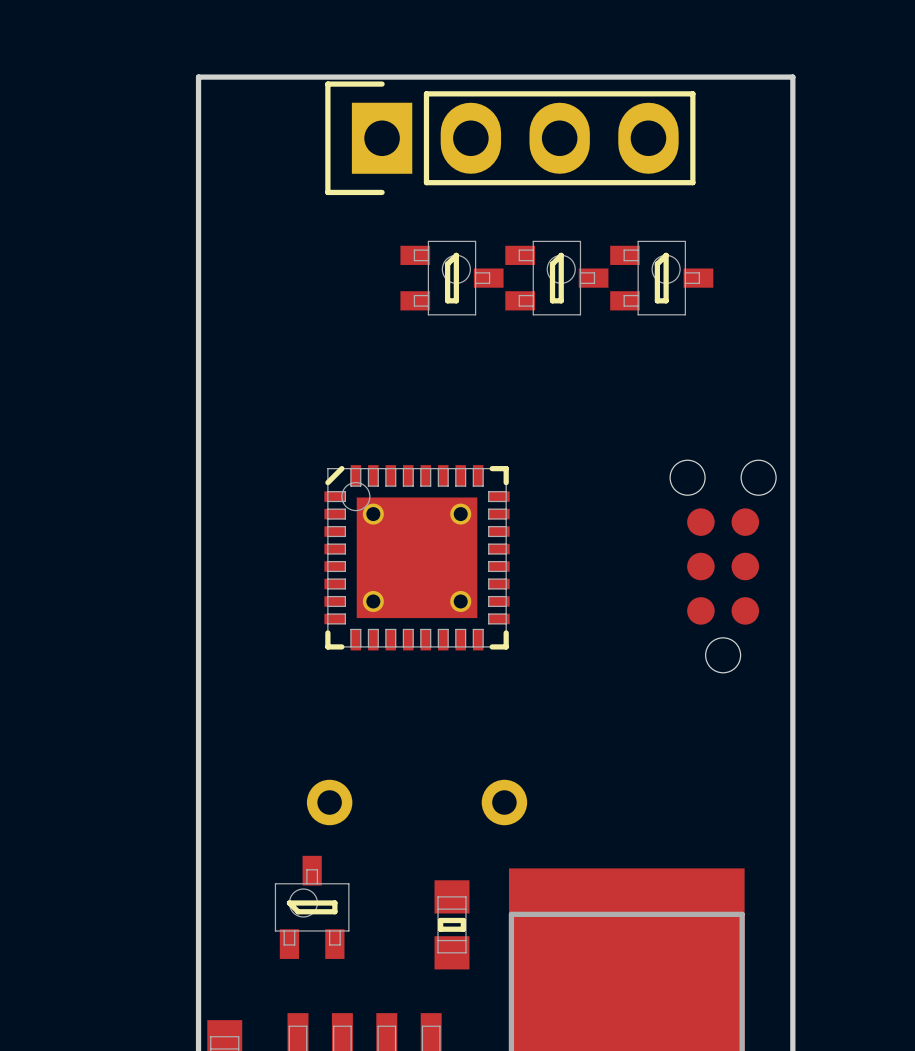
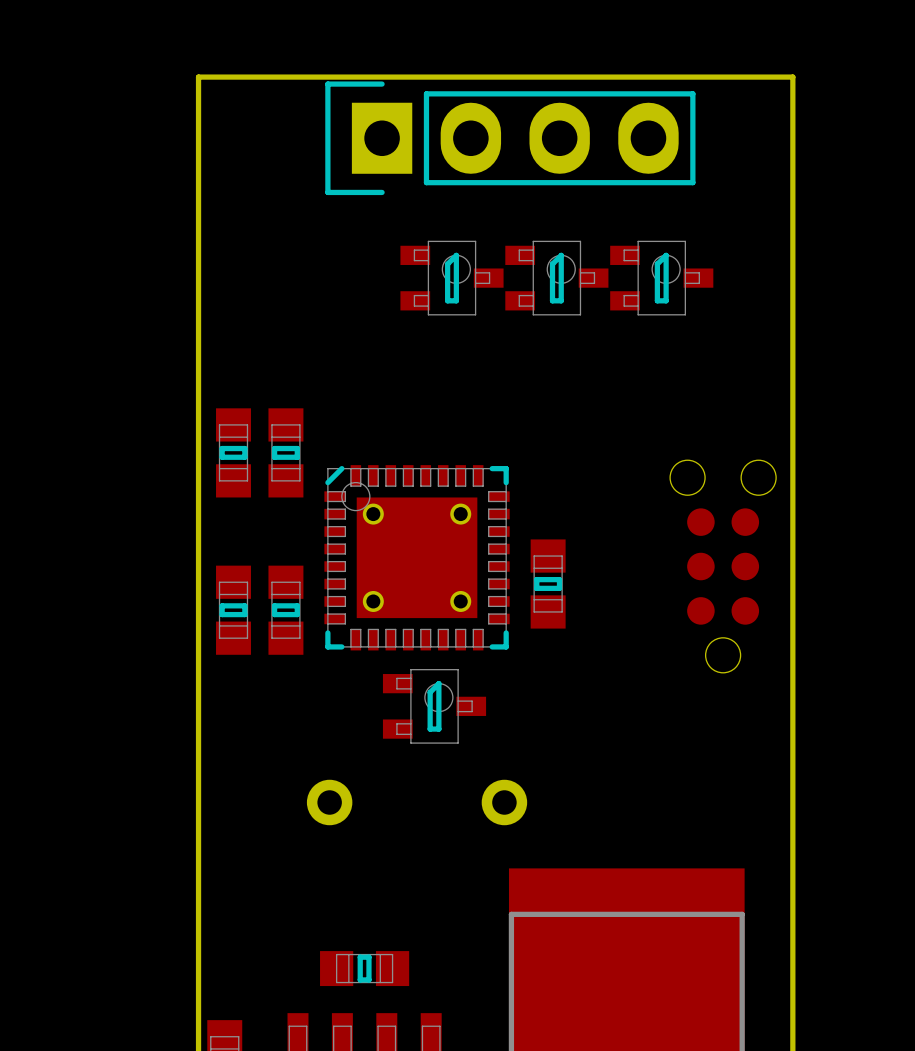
part: none -> (233, 452)
part: none -> (285, 452)
part: none -> (548, 584)
part: none -> (233, 610)
part: none -> (285, 610)
part rotation: 0° (312, 907) -> 90° clockwise (434, 706)
part position: (312, 907) -> (434, 706)
part rotation: 0° (451, 924) -> 90° clockwise (364, 968)
part position: (451, 924) -> (364, 968)

